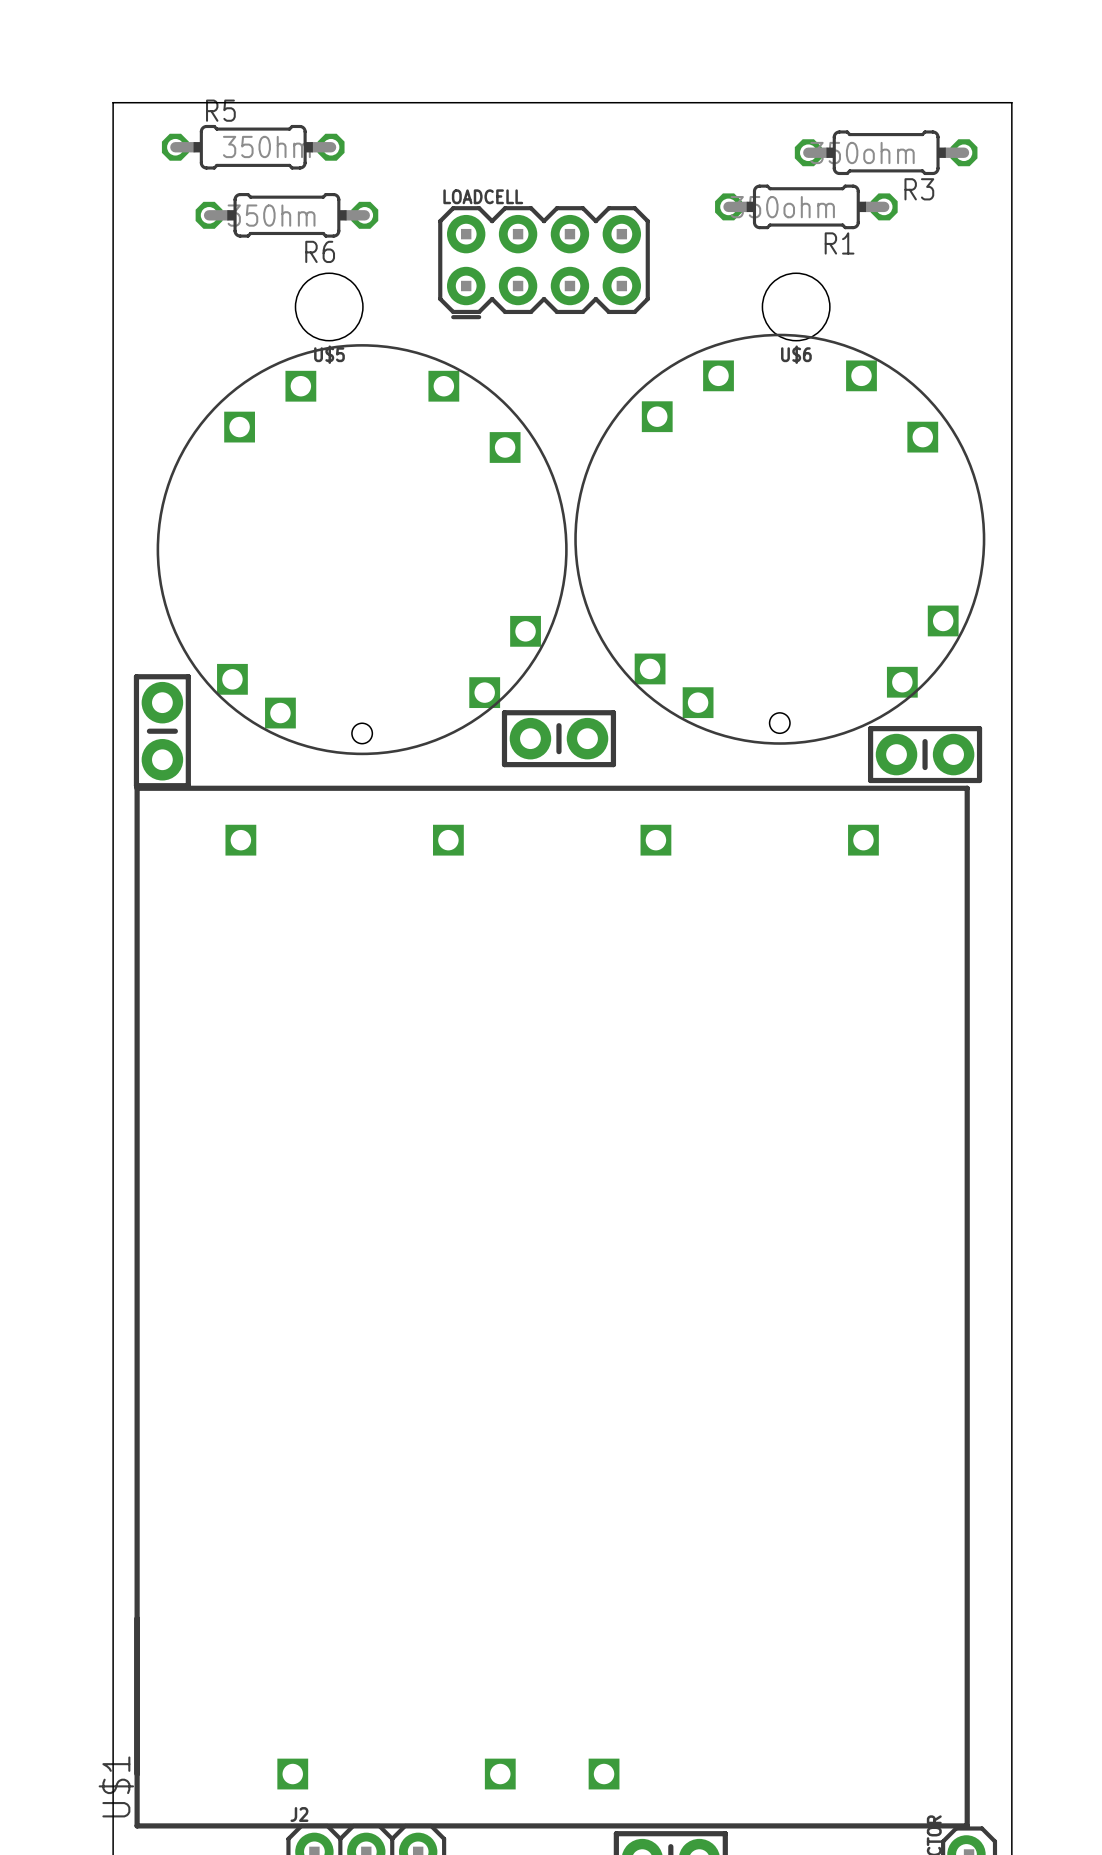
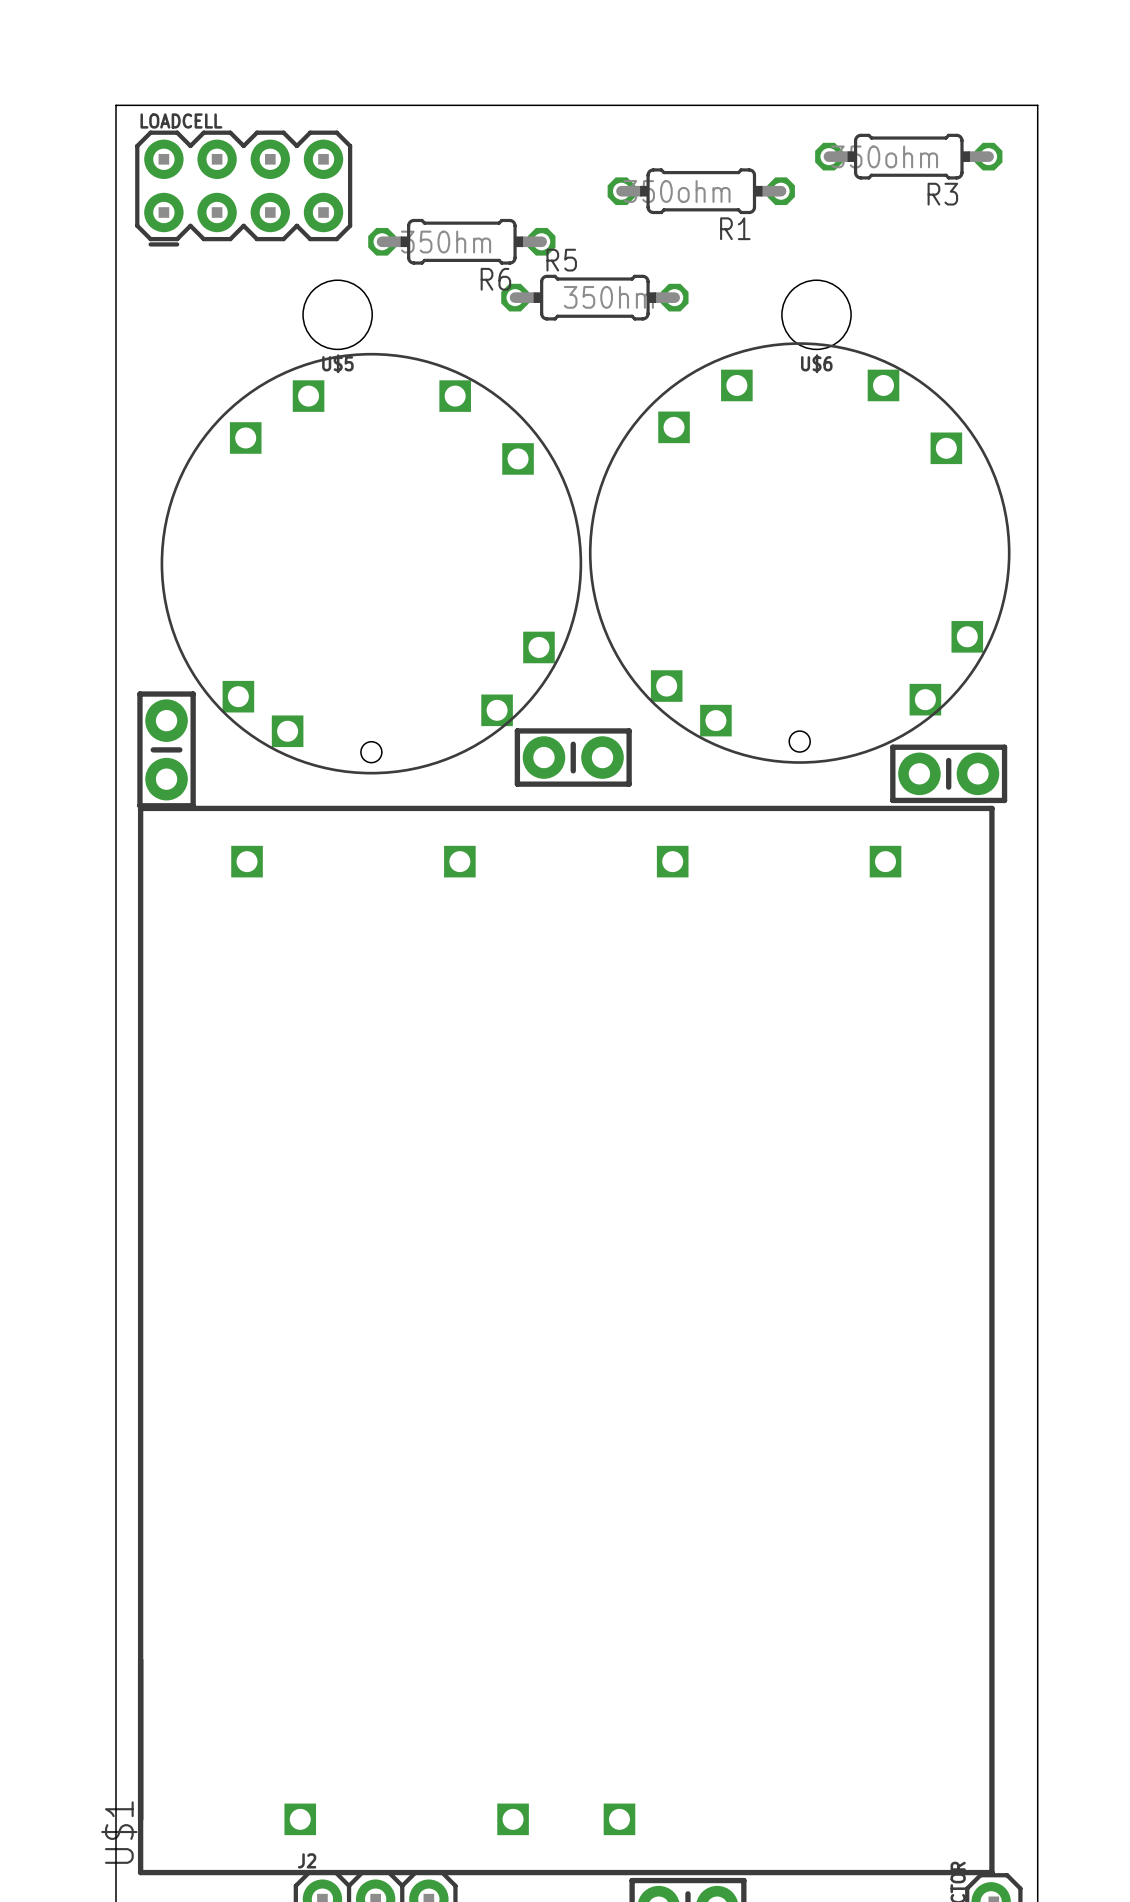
R5 position: (253, 147) -> (594, 297)
R1 position: (806, 206) -> (701, 191)
R6 position: (286, 215) -> (461, 241)
LOADCELL position: (544, 262) -> (243, 188)

